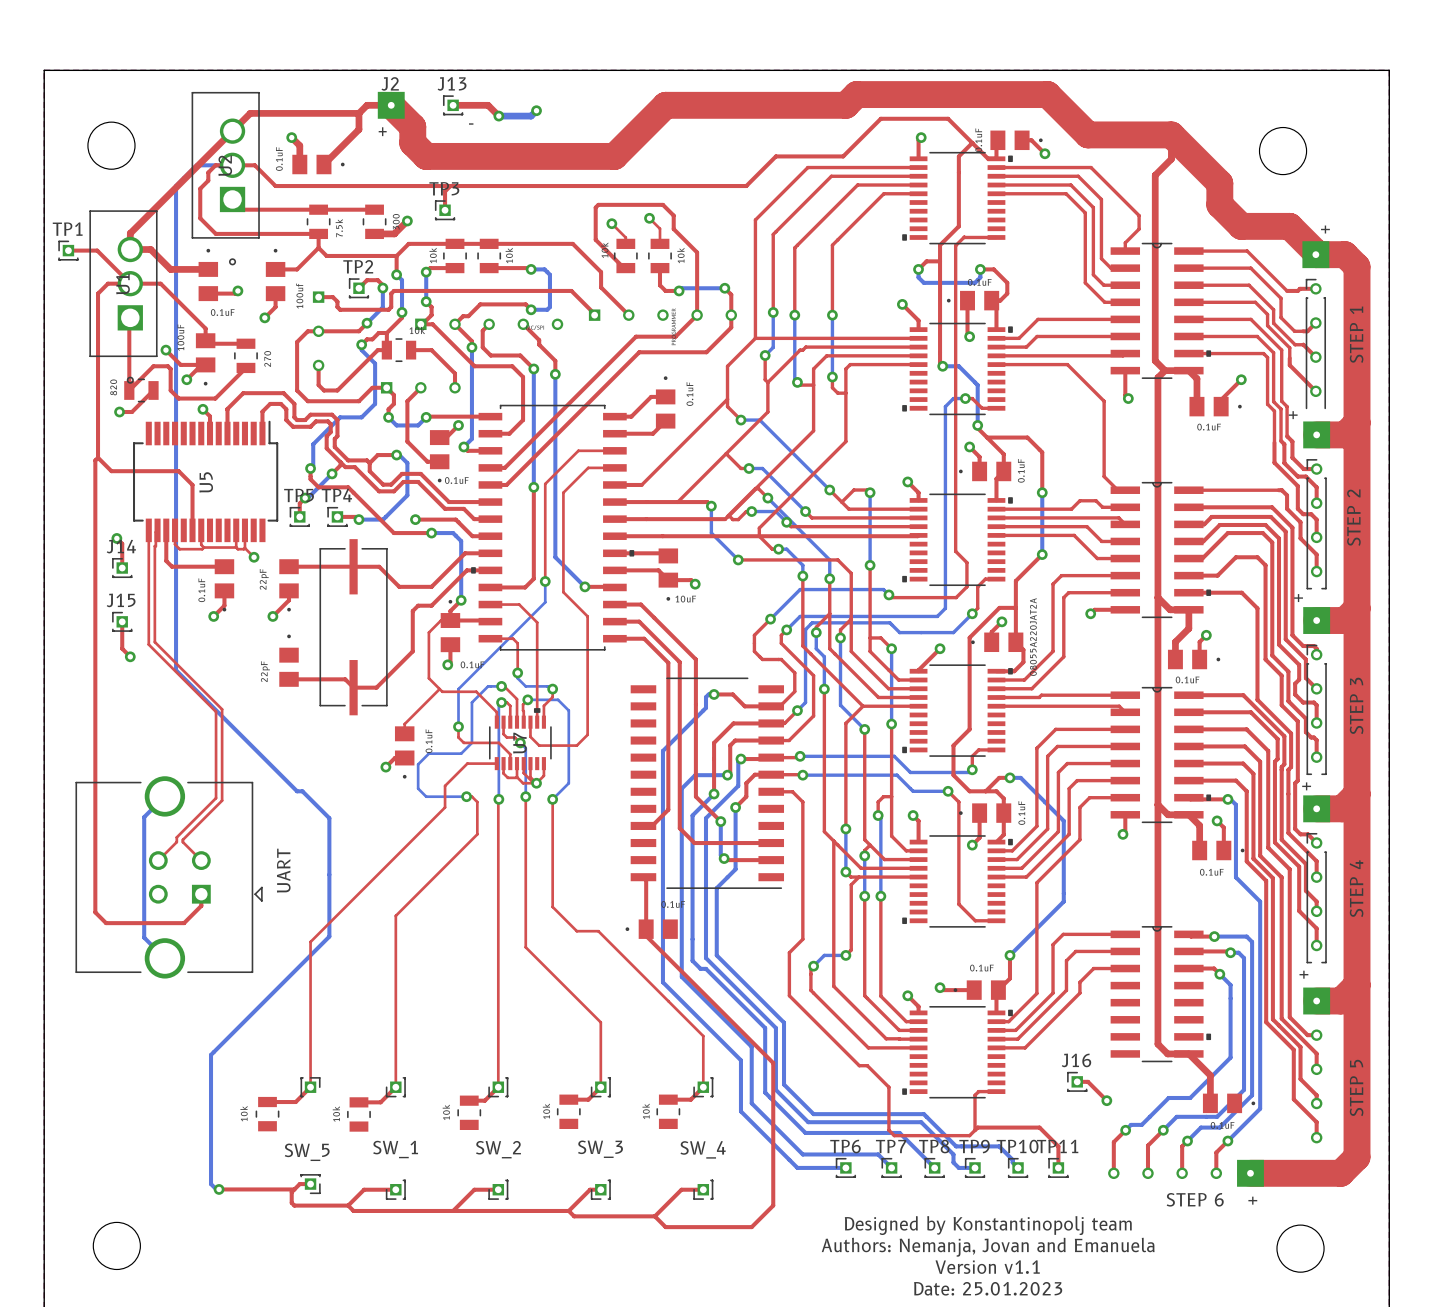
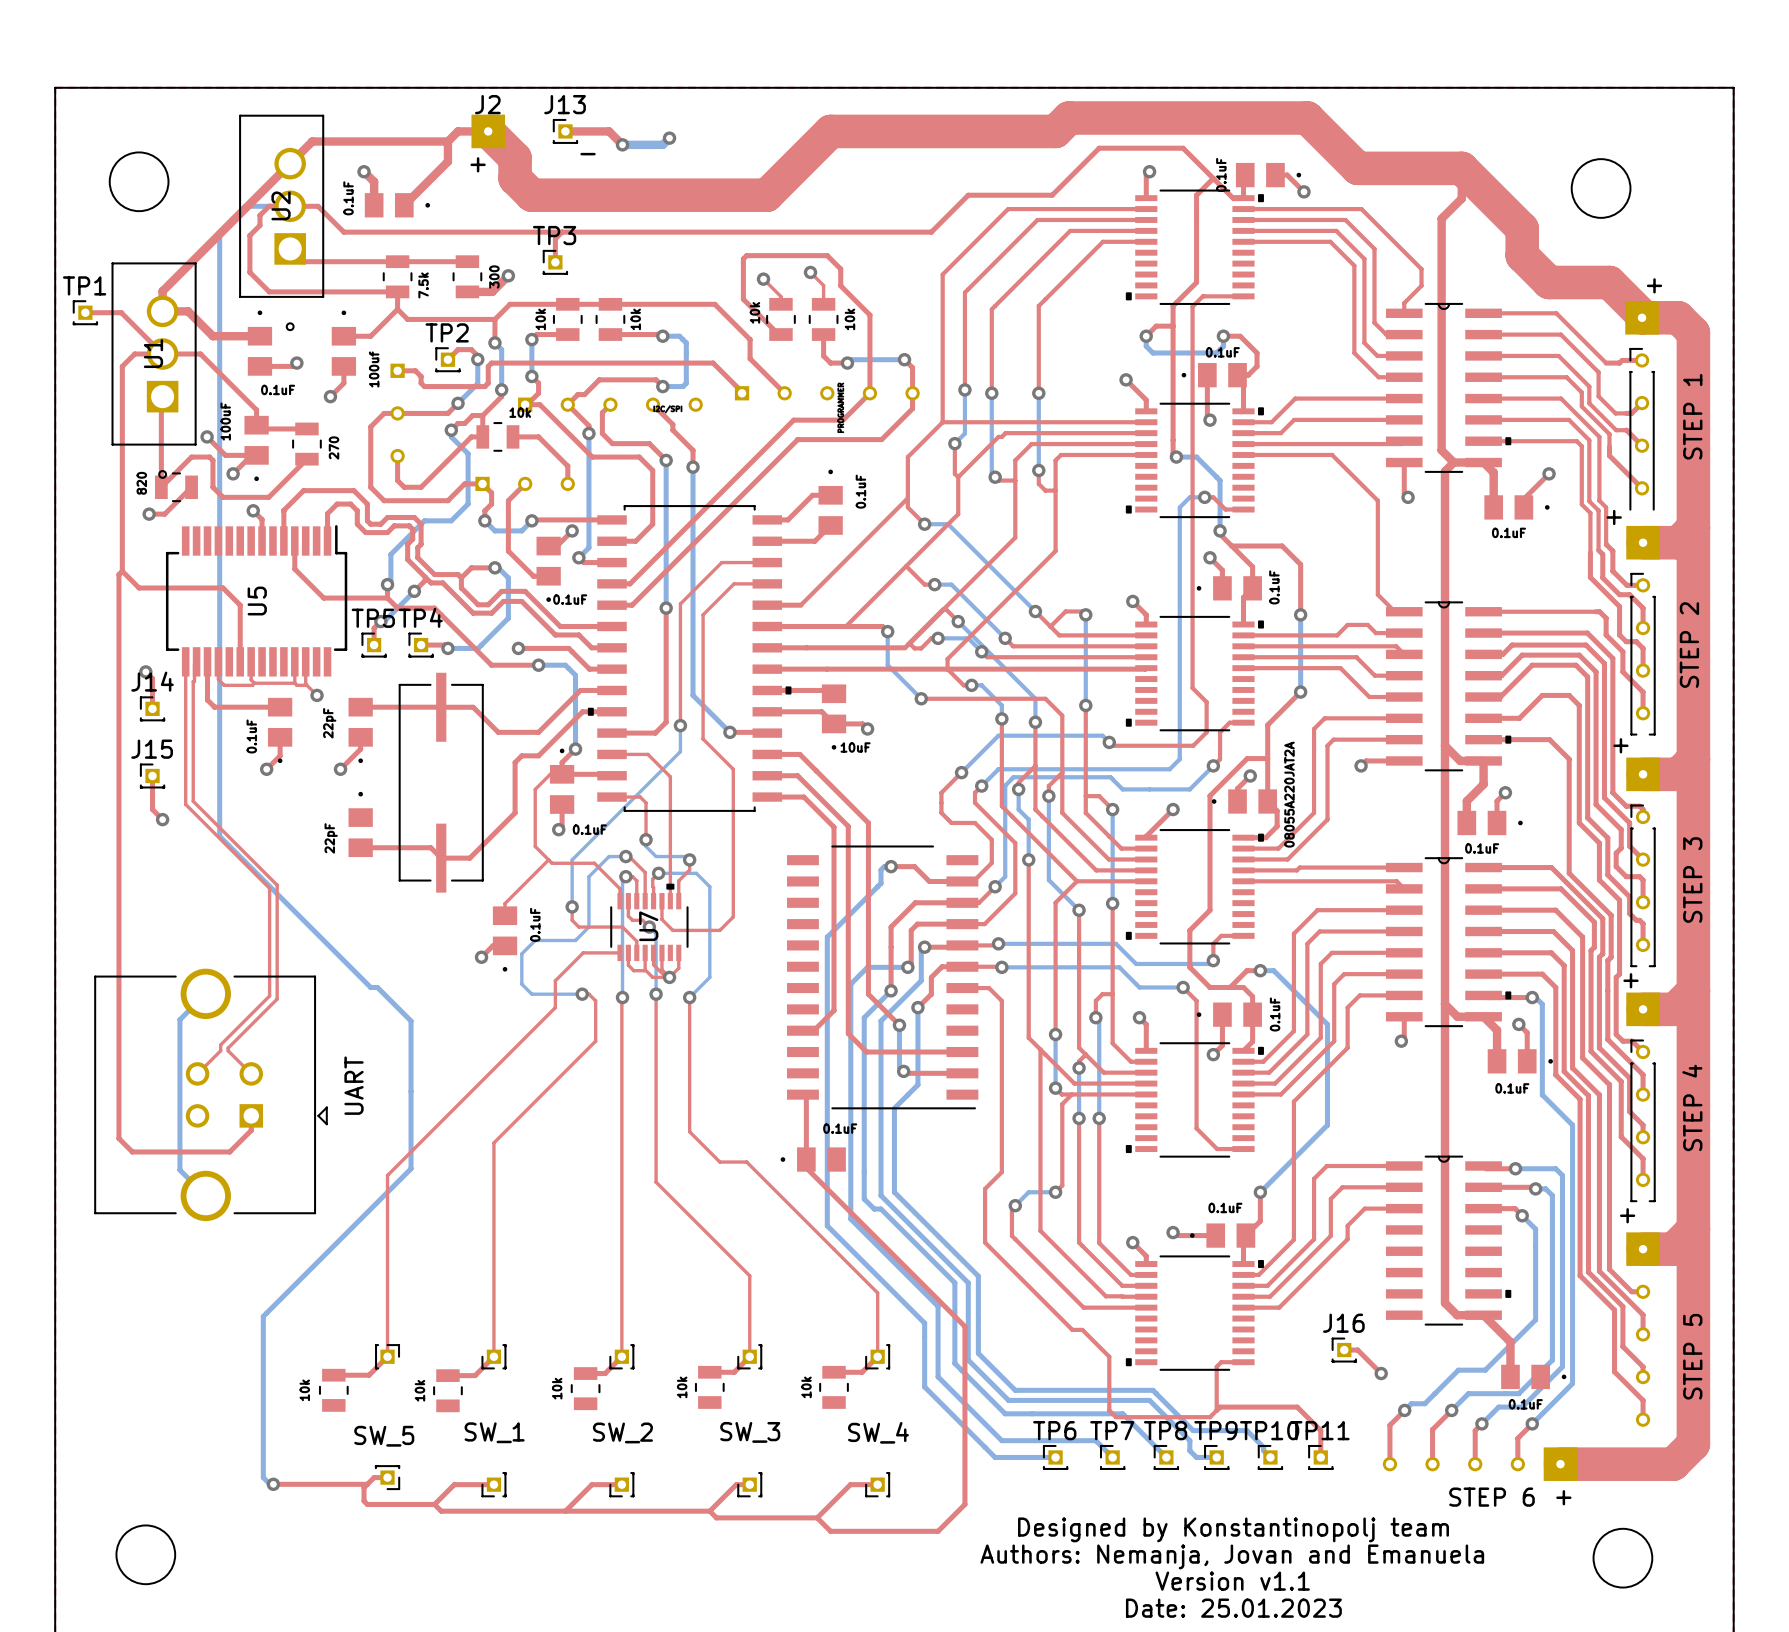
top track: none -> (294, 540) (294, 569) (323, 598) (387, 598)

